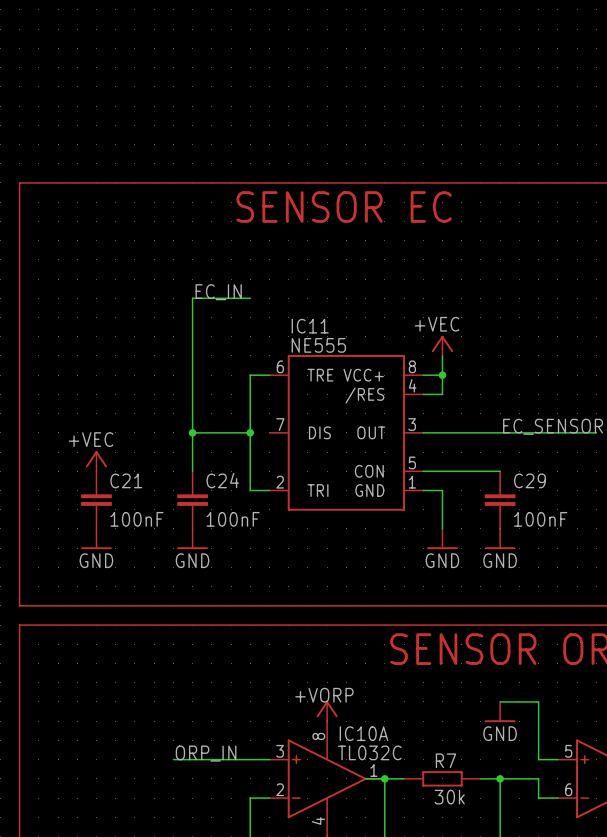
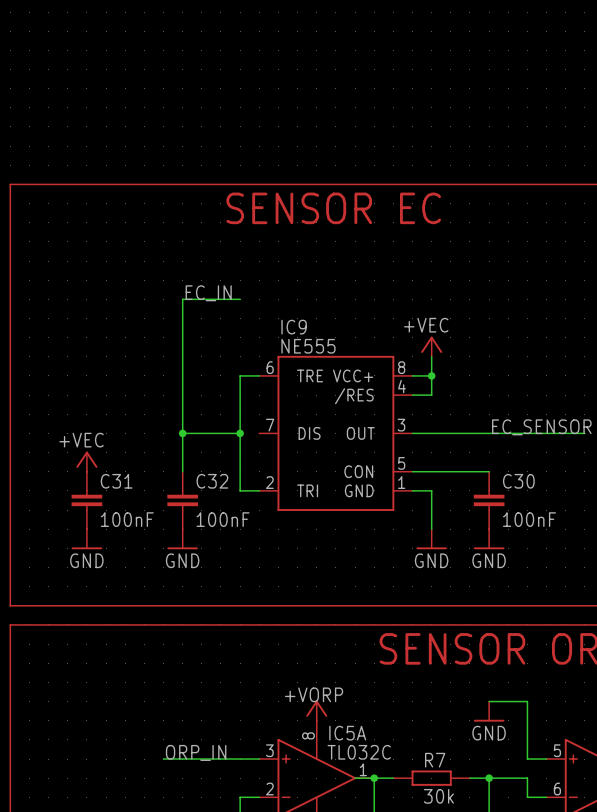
IC11 name: IC11 (310, 326) -> IC9 (294, 327)
C21 name: C21 (126, 480) -> C31 (116, 481)
C24 name: C24 (222, 480) -> C32 (212, 481)
C29 name: C29 (529, 480) -> C30 (518, 481)
IC10A name: IC10A (363, 733) -> IC5A (347, 733)

